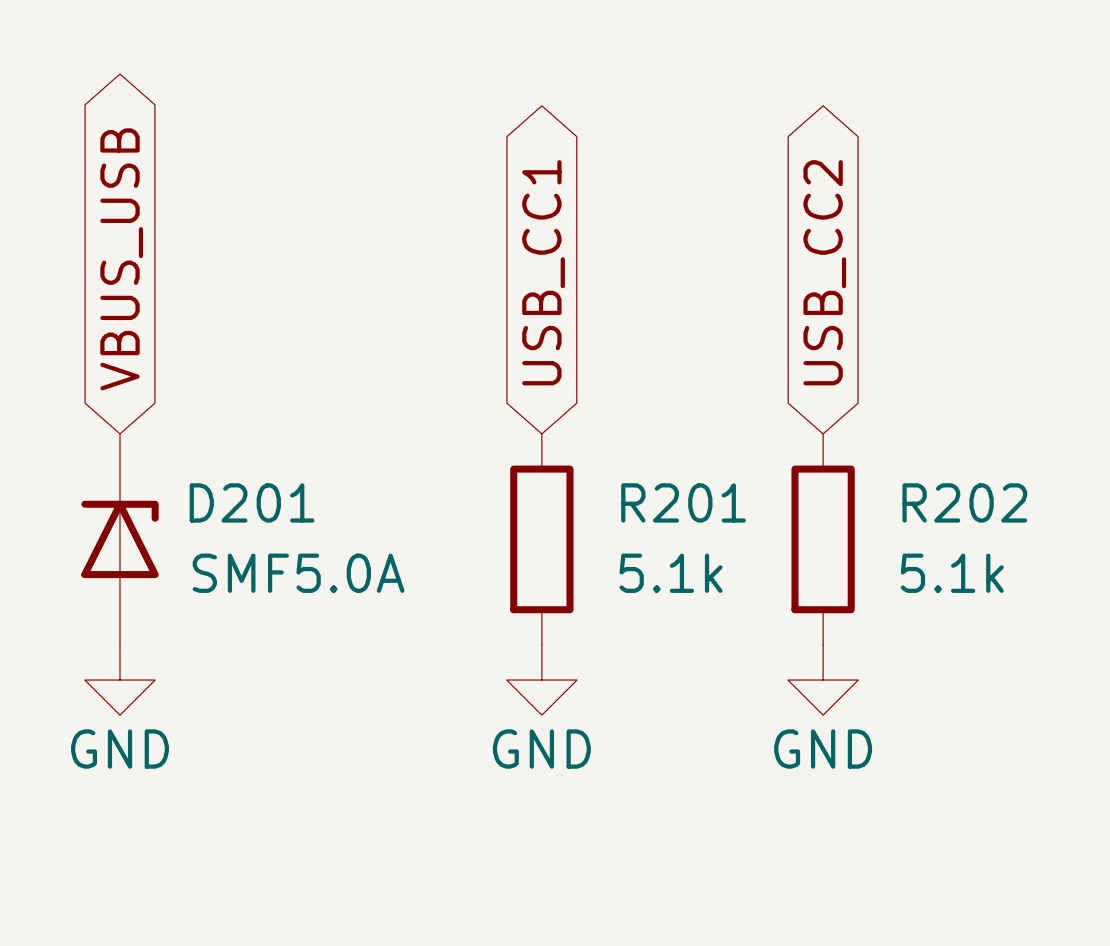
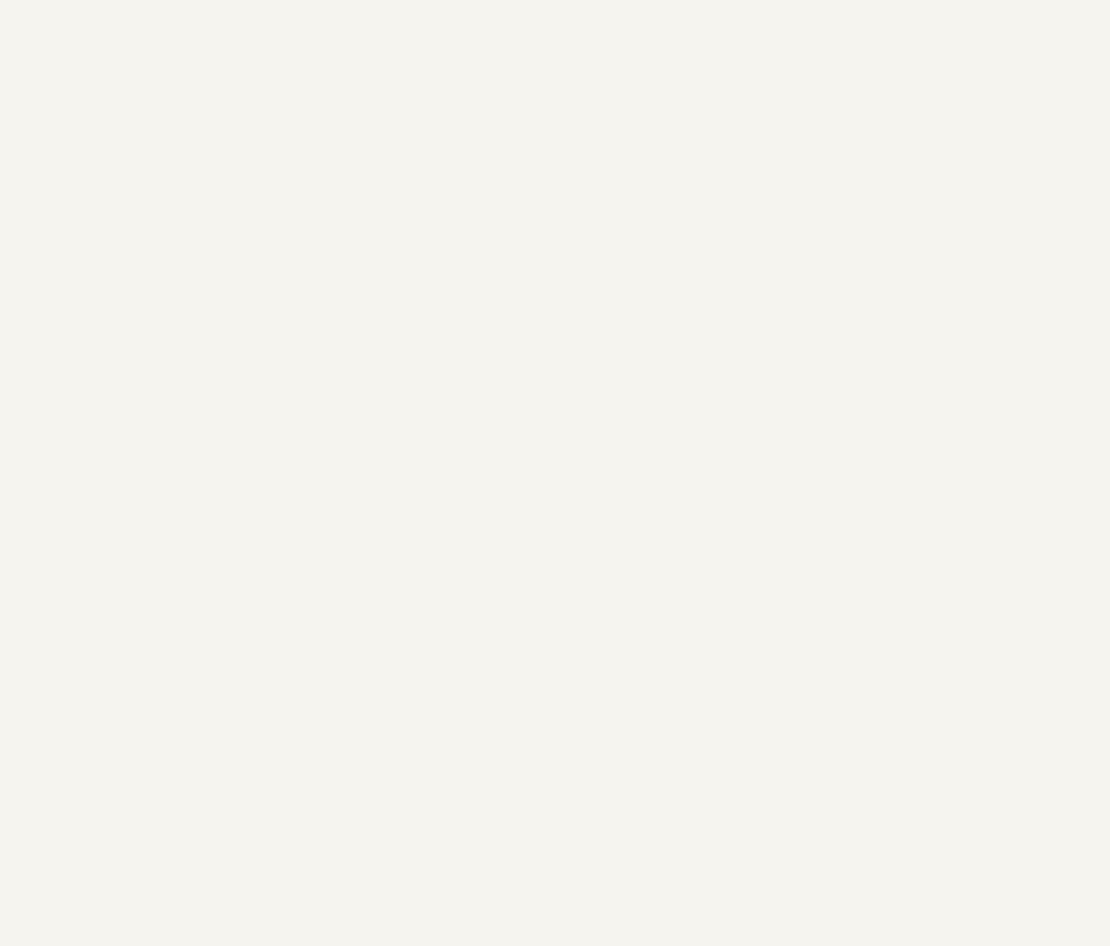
global label: VBUS_USB (121, 259) -> none
global label: USB_CC1 (543, 272) -> none
global label: USB_CC2 (824, 272) -> none
D201: SMF5.0A (119, 539) -> none
R201: 5.1k (541, 539) -> none
R202: 5.1k (823, 539) -> none
power symbol: GND (119, 680) -> none
power symbol: GND (541, 680) -> none
power symbol: GND (823, 680) -> none

